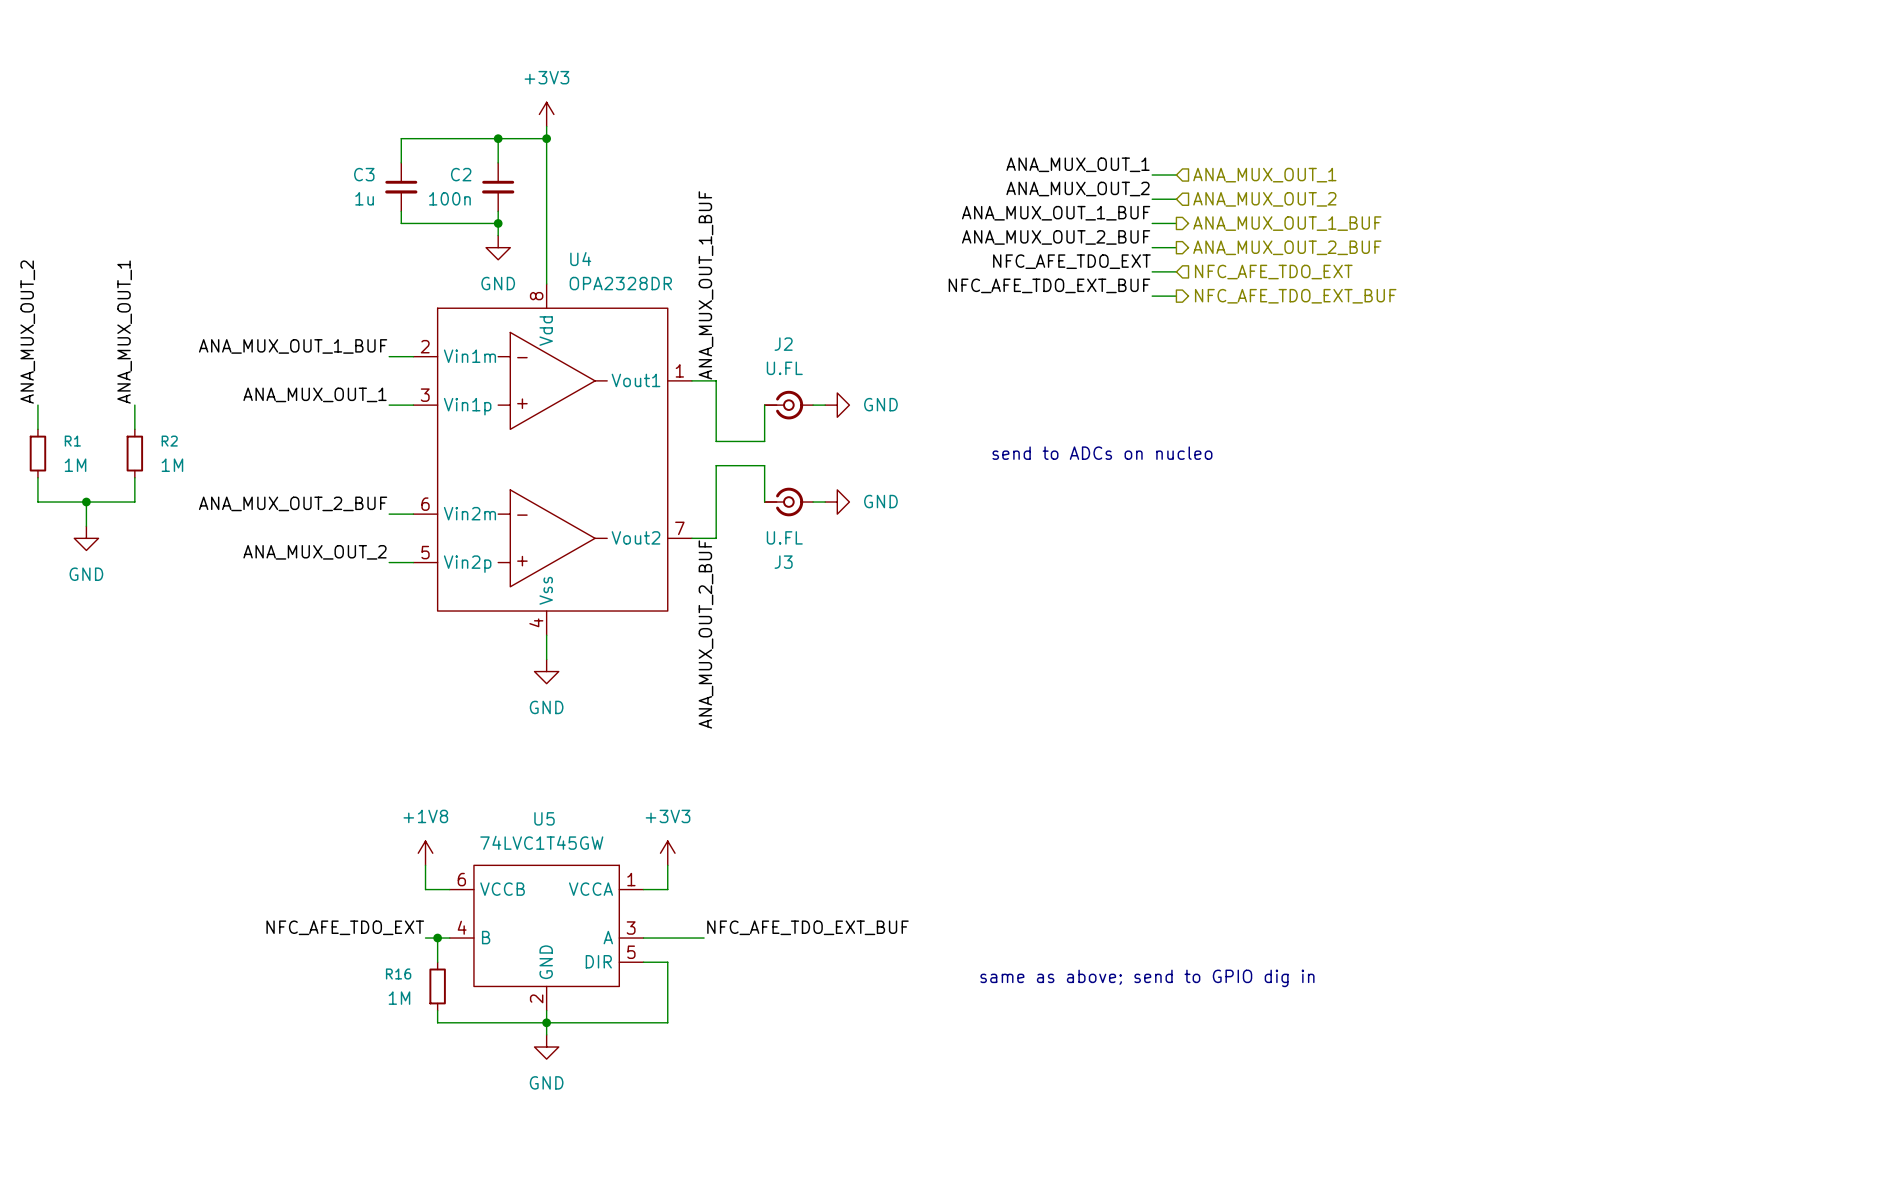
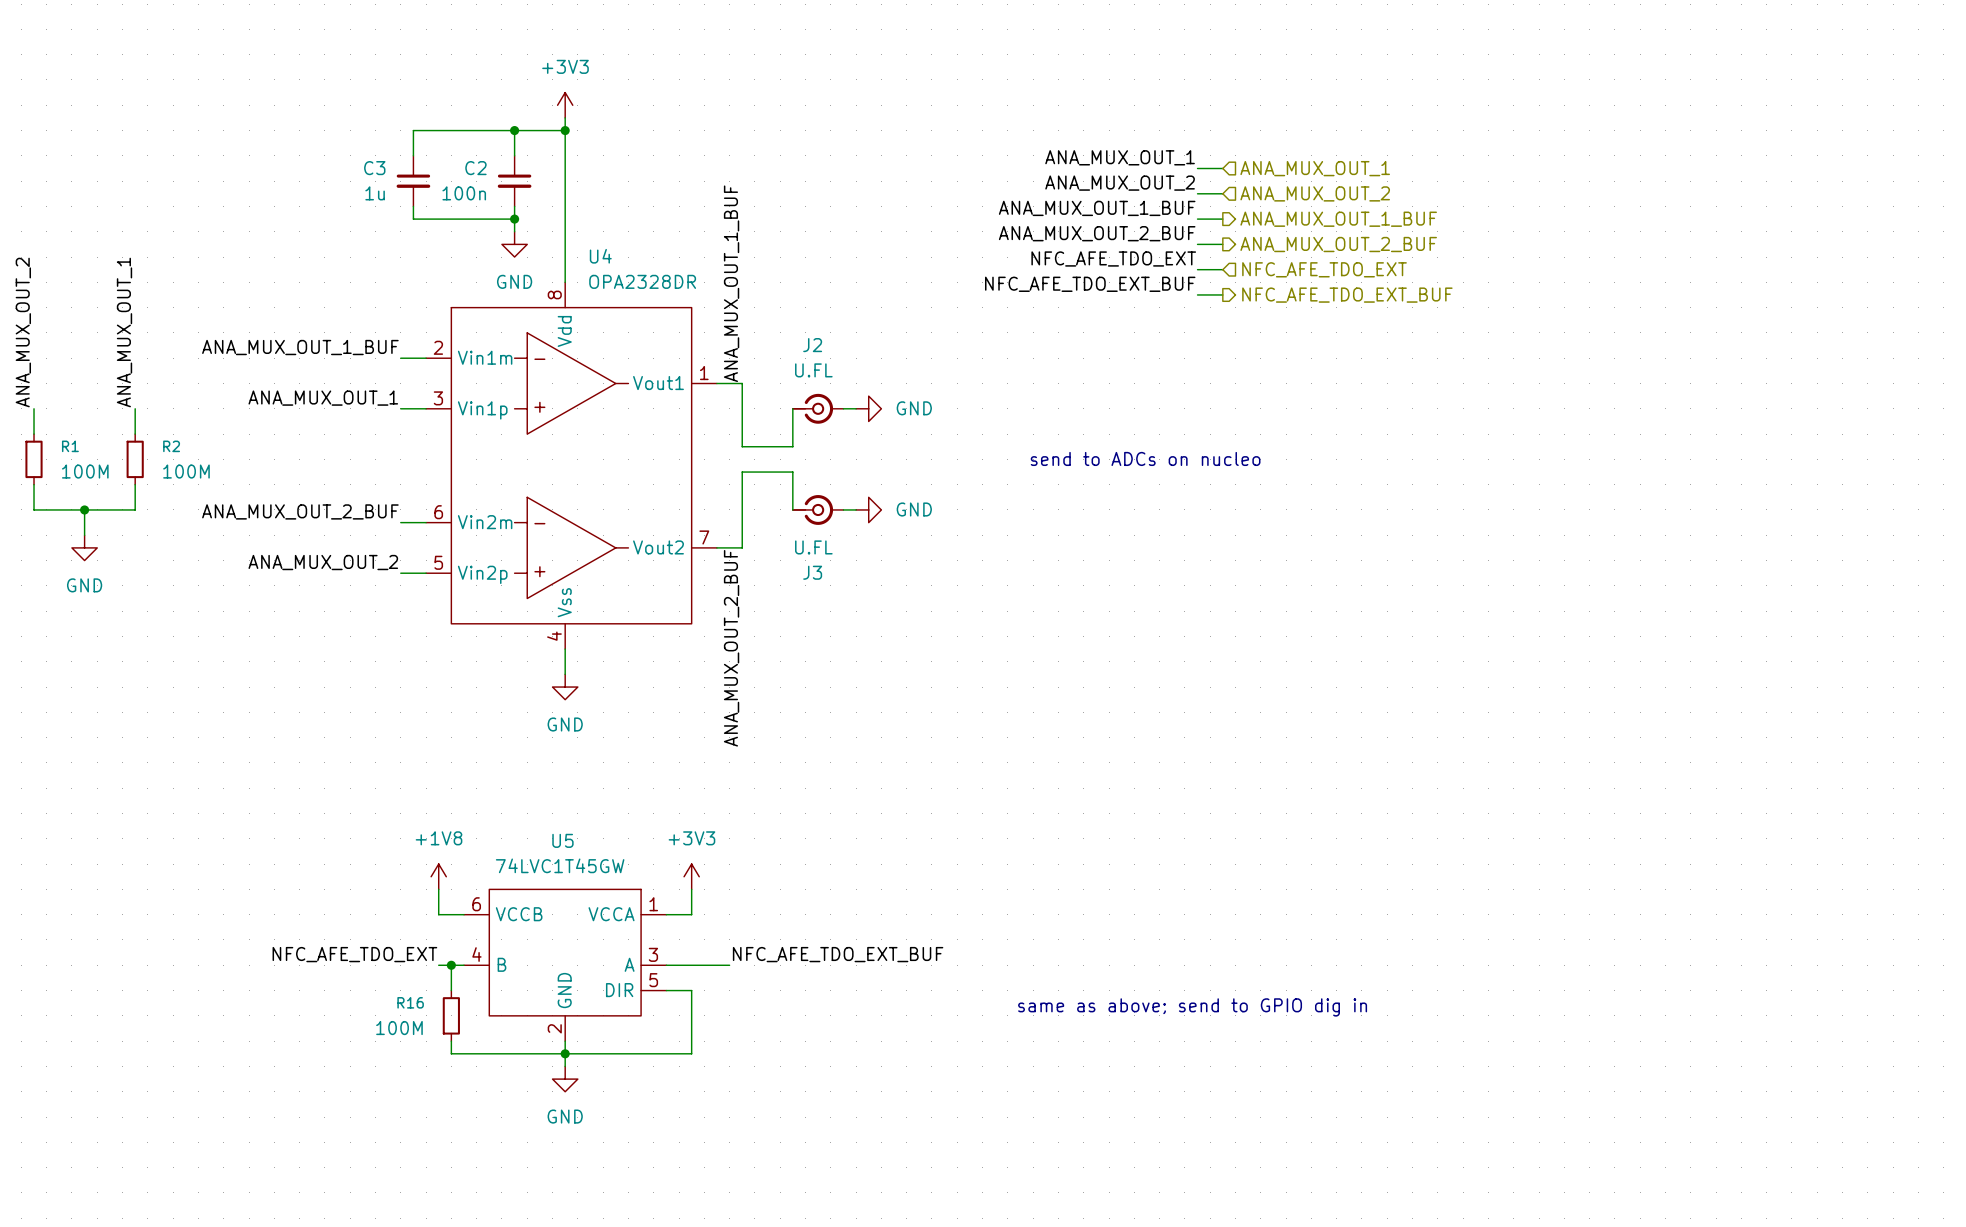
R1 value: 1M (75, 465) -> 100M (85, 471)
R2 value: 1M (172, 465) -> 100M (186, 471)
R16 value: 1M (399, 998) -> 100M (399, 1028)

